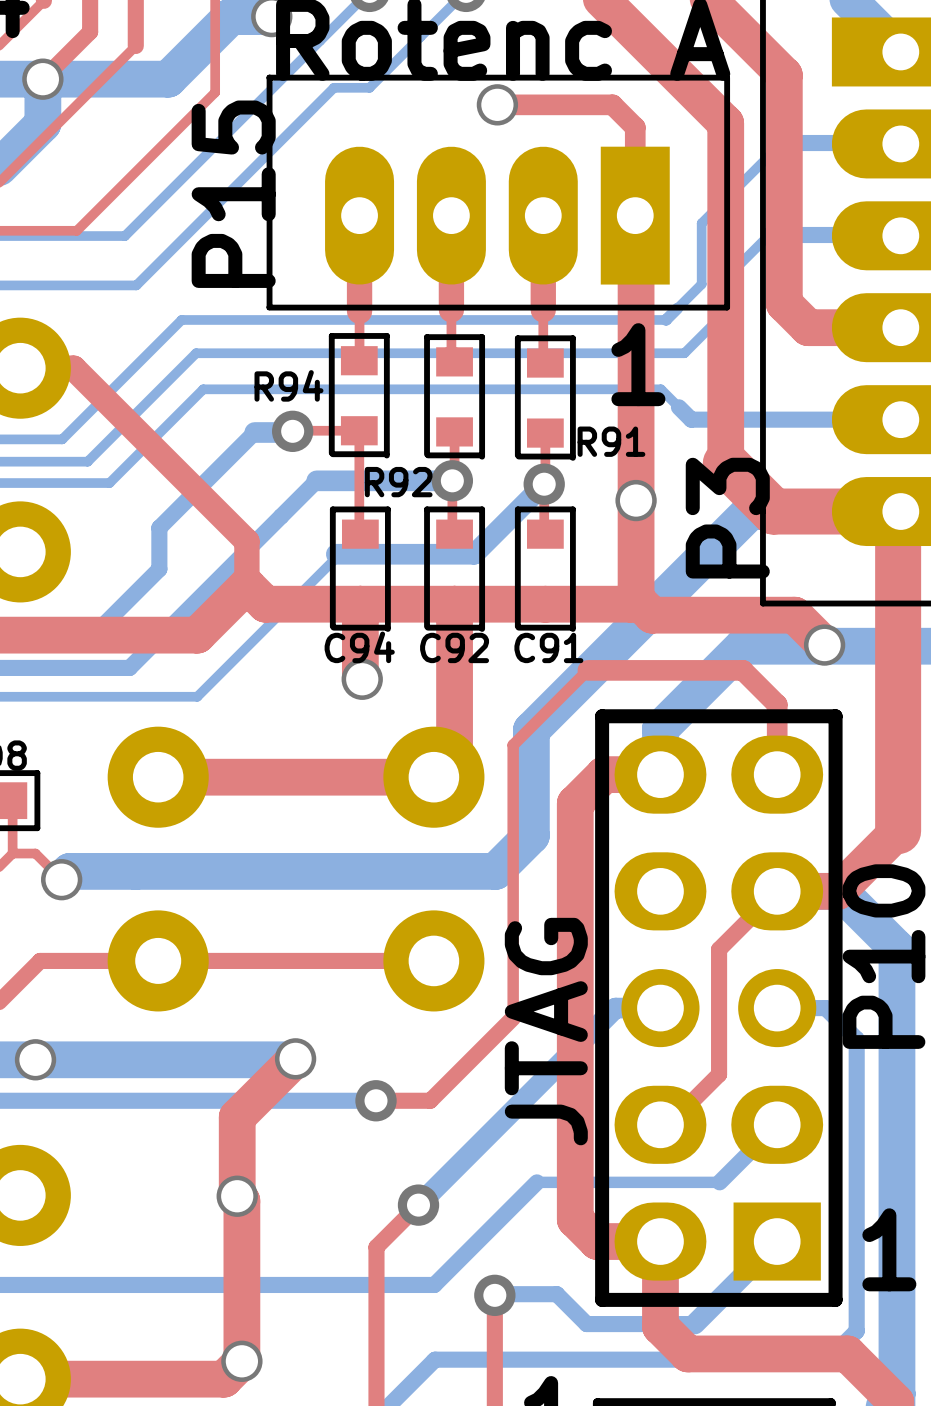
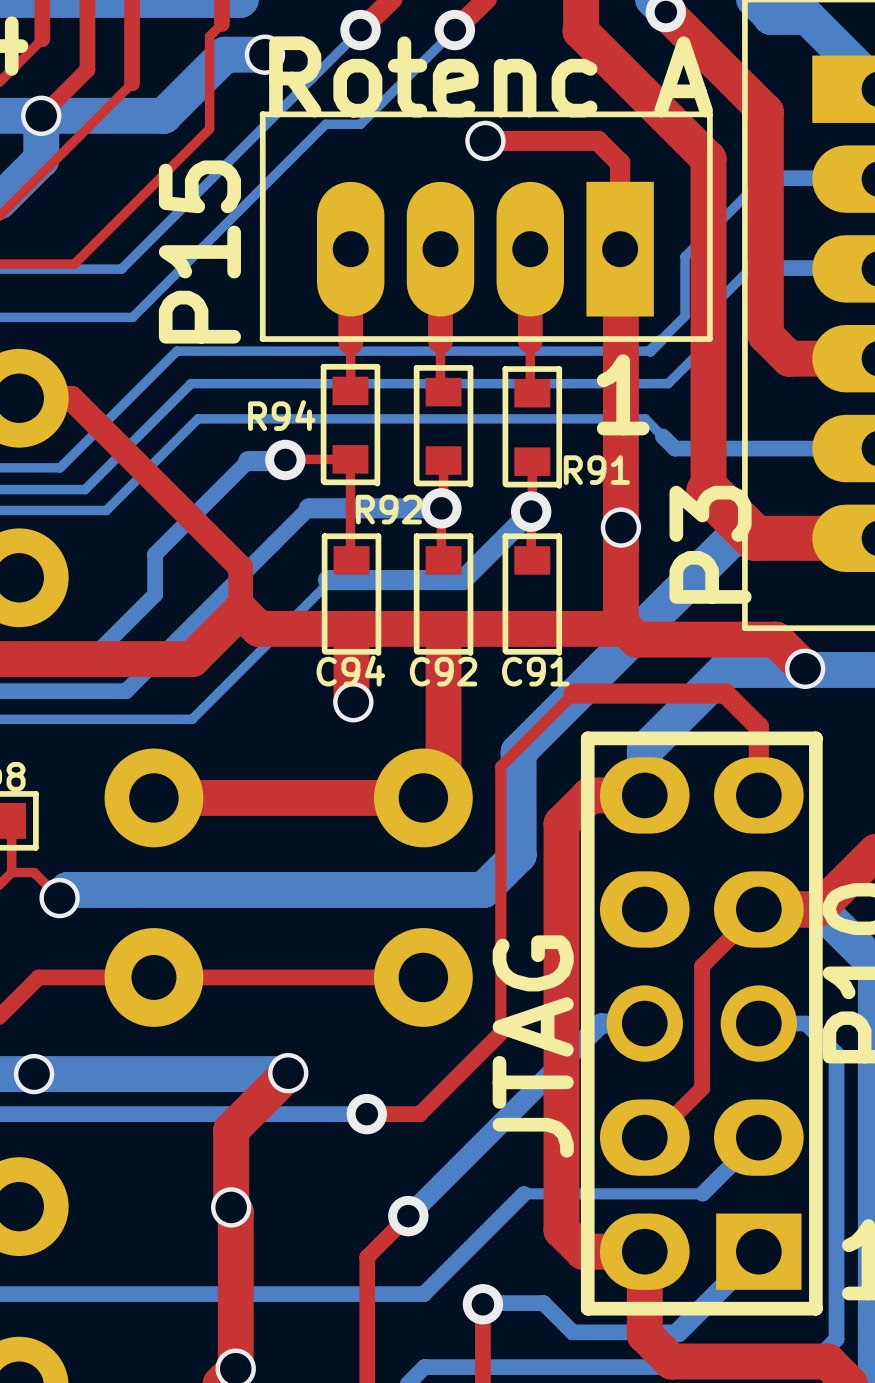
P15 name position: P15 (233, 194) -> P15 (199, 252)

